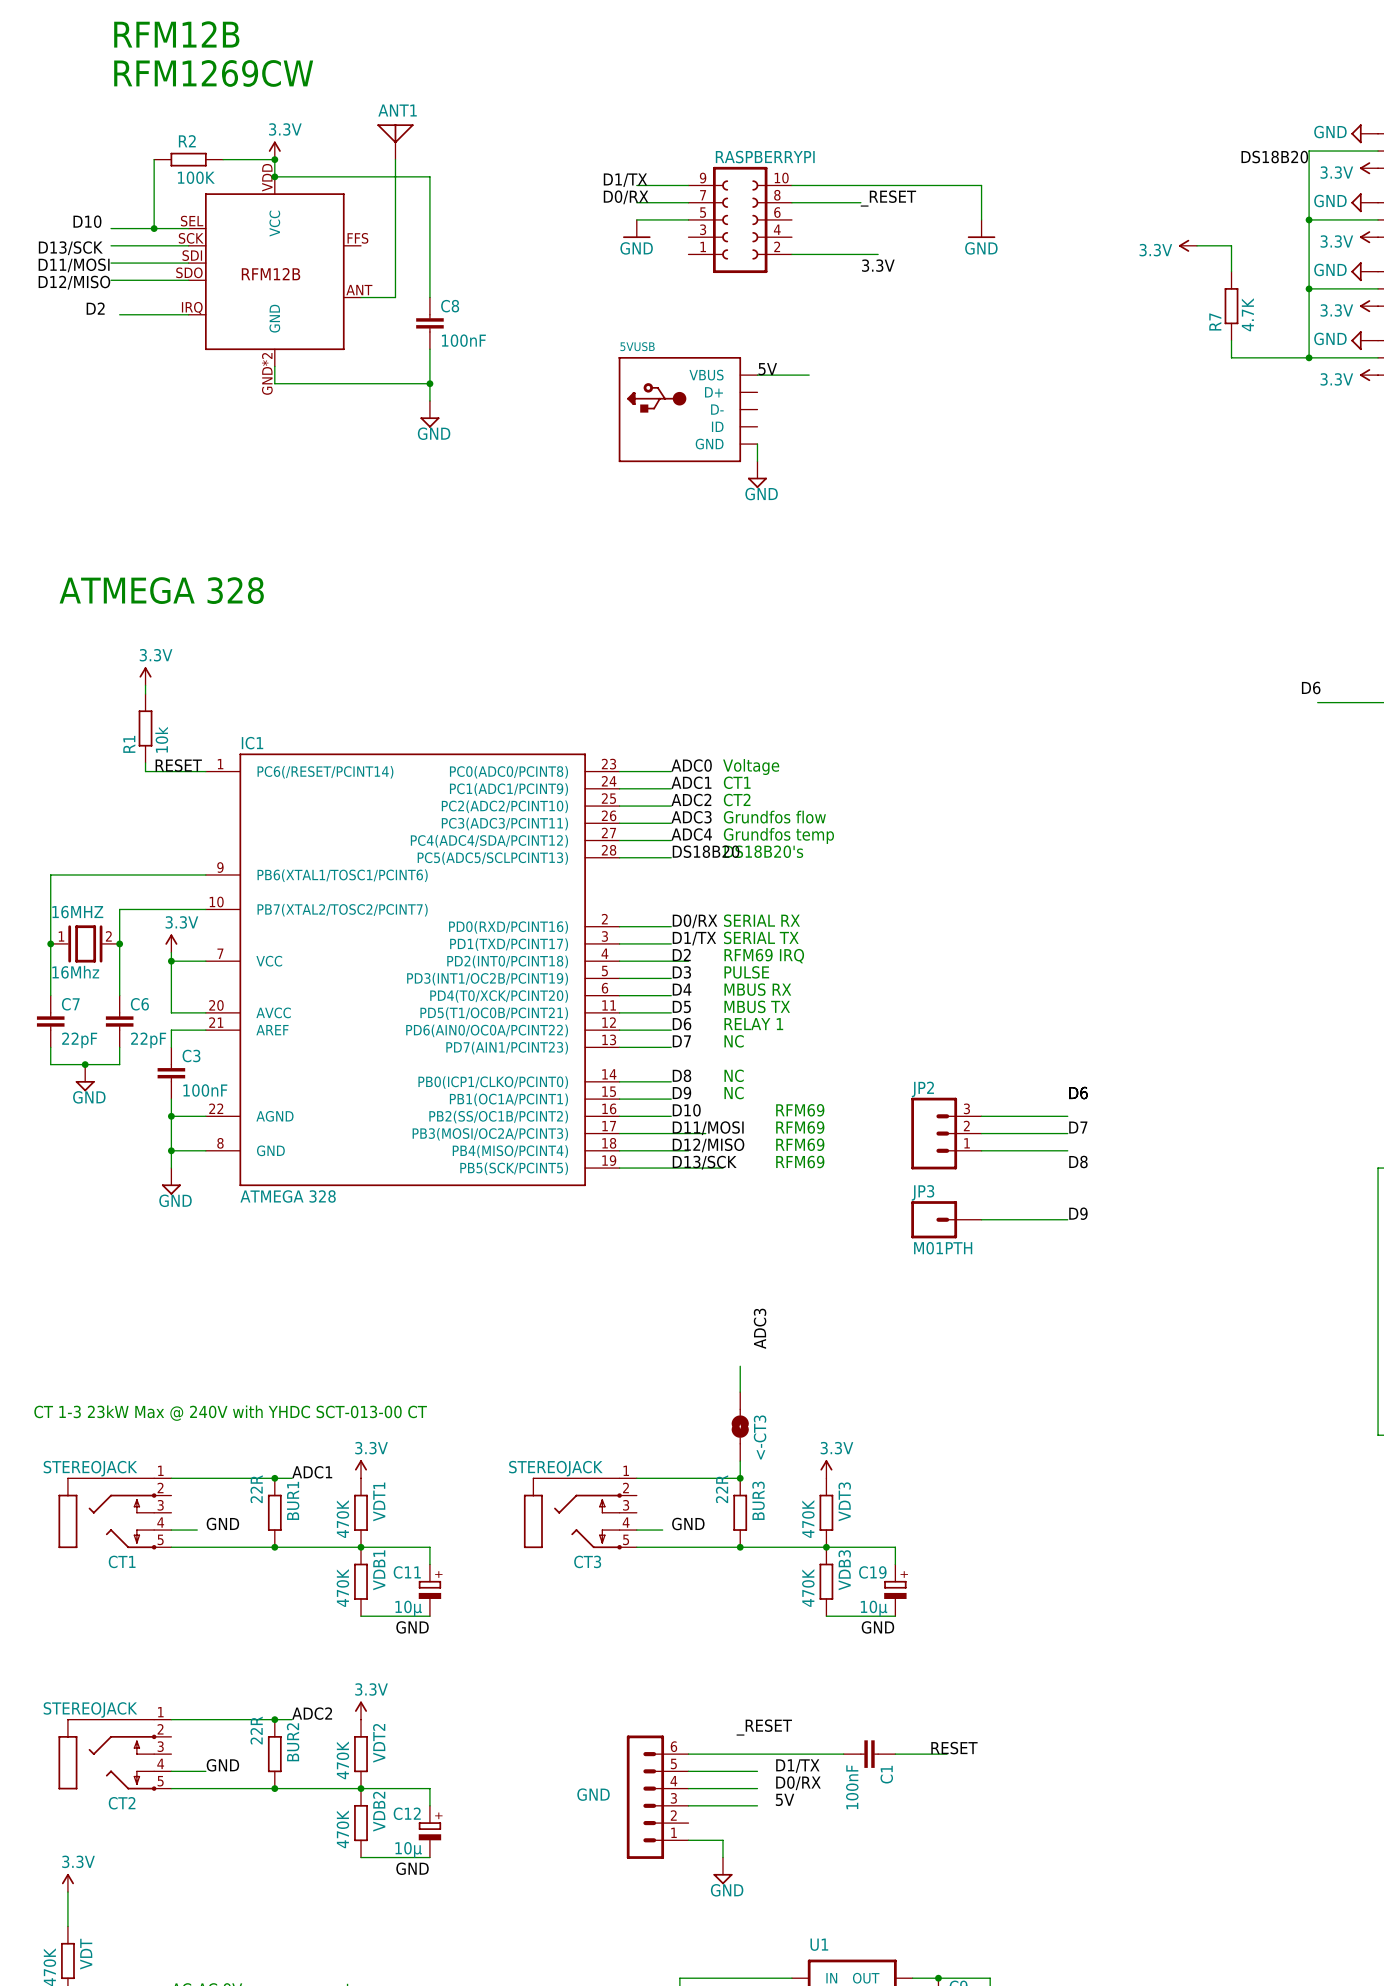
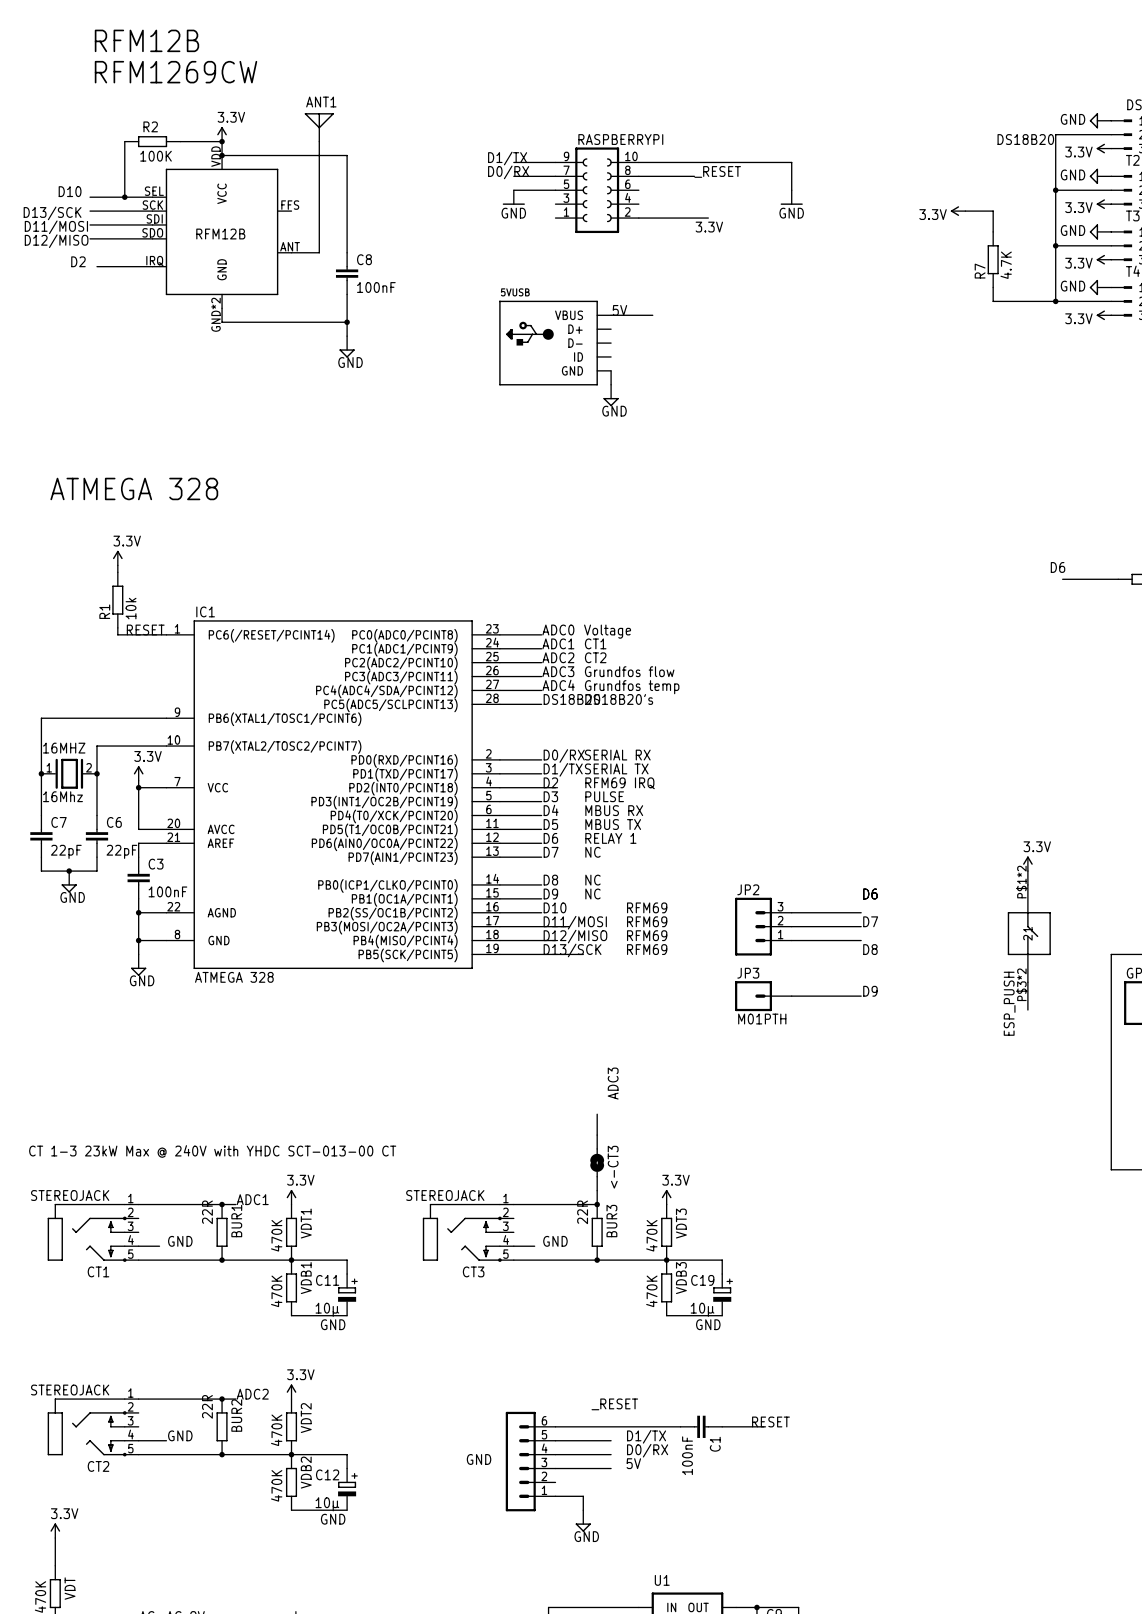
power symbol: none -> 3.3V (1027, 863)
wire: none -> (1027, 871) (1027, 884)
part: none -> (1029, 933)
wire: none -> (1027, 982) (1027, 1010)
label: none -> ESP_PUSH (1009, 1003)

